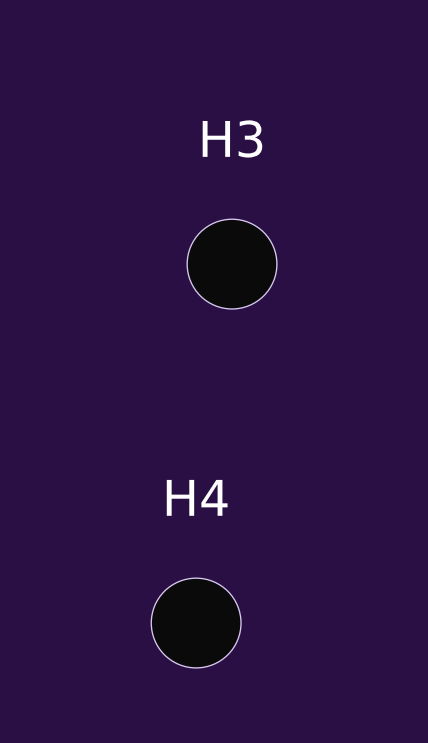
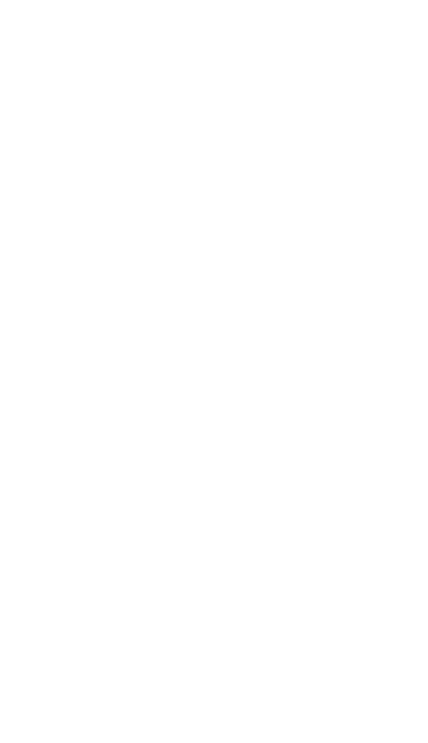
H3: (232, 264) -> none
H4: (196, 623) -> none

